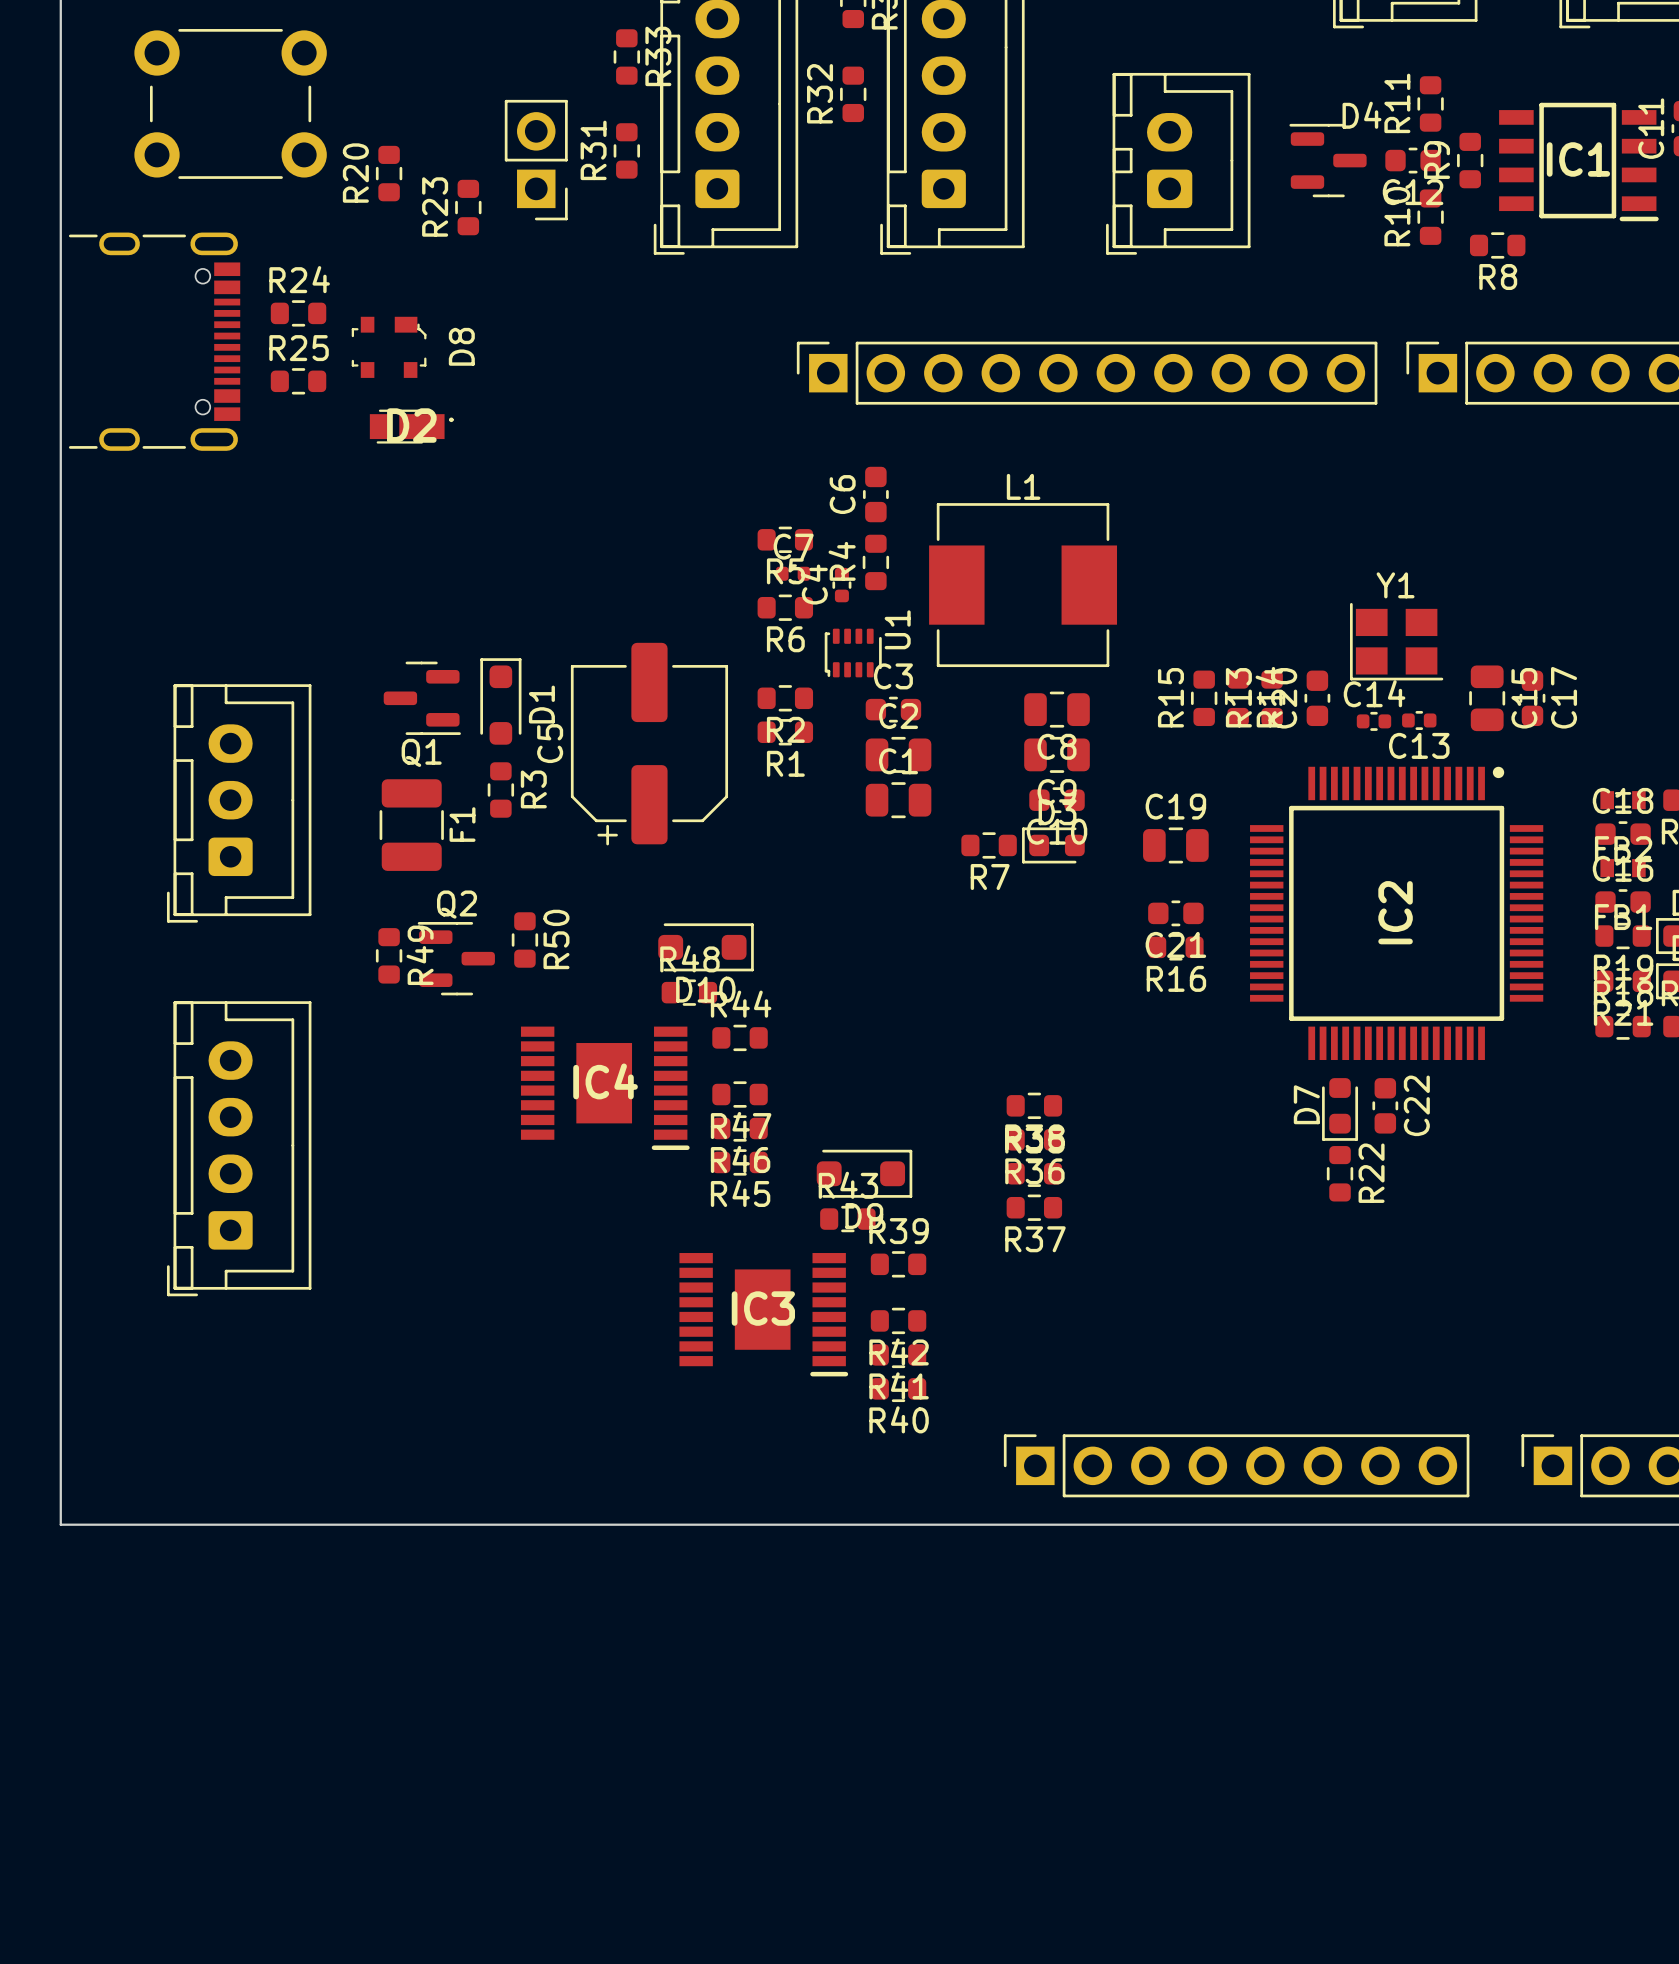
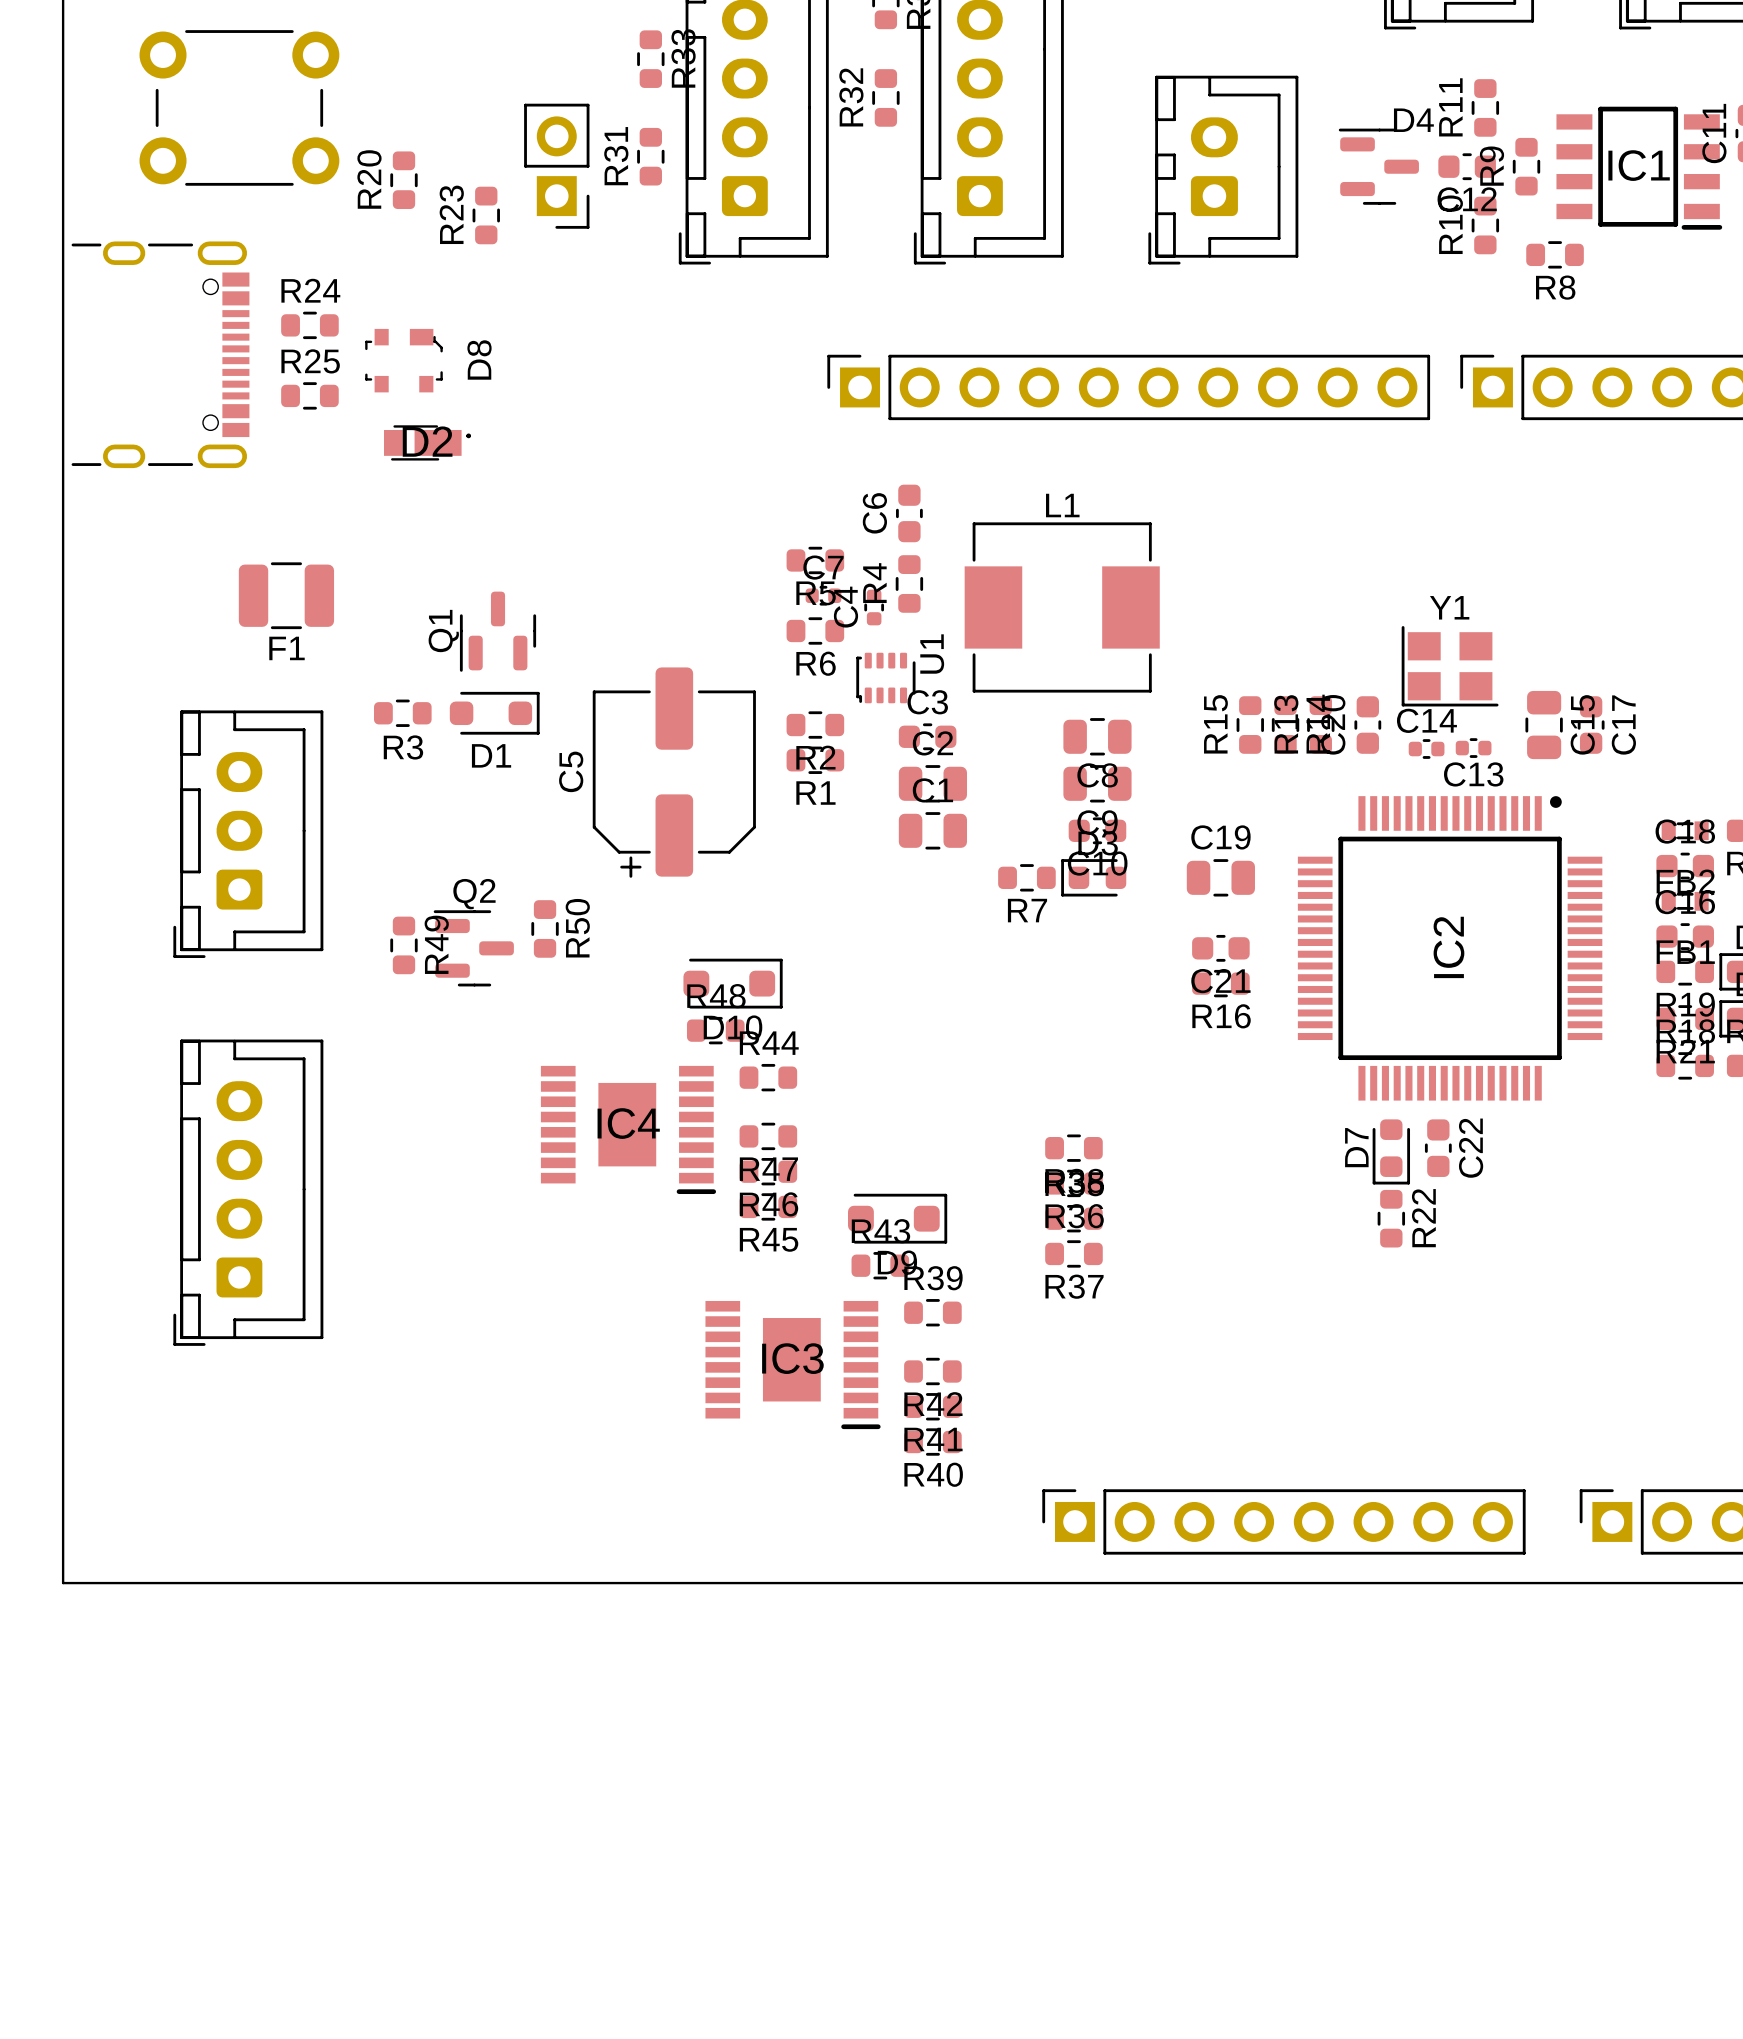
Q1 rotation: 0° (422, 698) -> 90° clockwise (498, 631)
Q1 position: (422, 698) -> (498, 631)
D1 rotation: 0° (500, 701) -> 90° clockwise (494, 713)
R3 rotation: 0° (500, 789) -> 90° clockwise (402, 713)
R3 position: (500, 789) -> (402, 713)
F1 rotation: 0° (411, 825) -> 90° clockwise (286, 595)
F1 position: (411, 825) -> (286, 595)
R50 position: (524, 939) -> (545, 928)
R49 position: (389, 955) -> (403, 945)
Q2 position: (456, 958) -> (473, 948)

